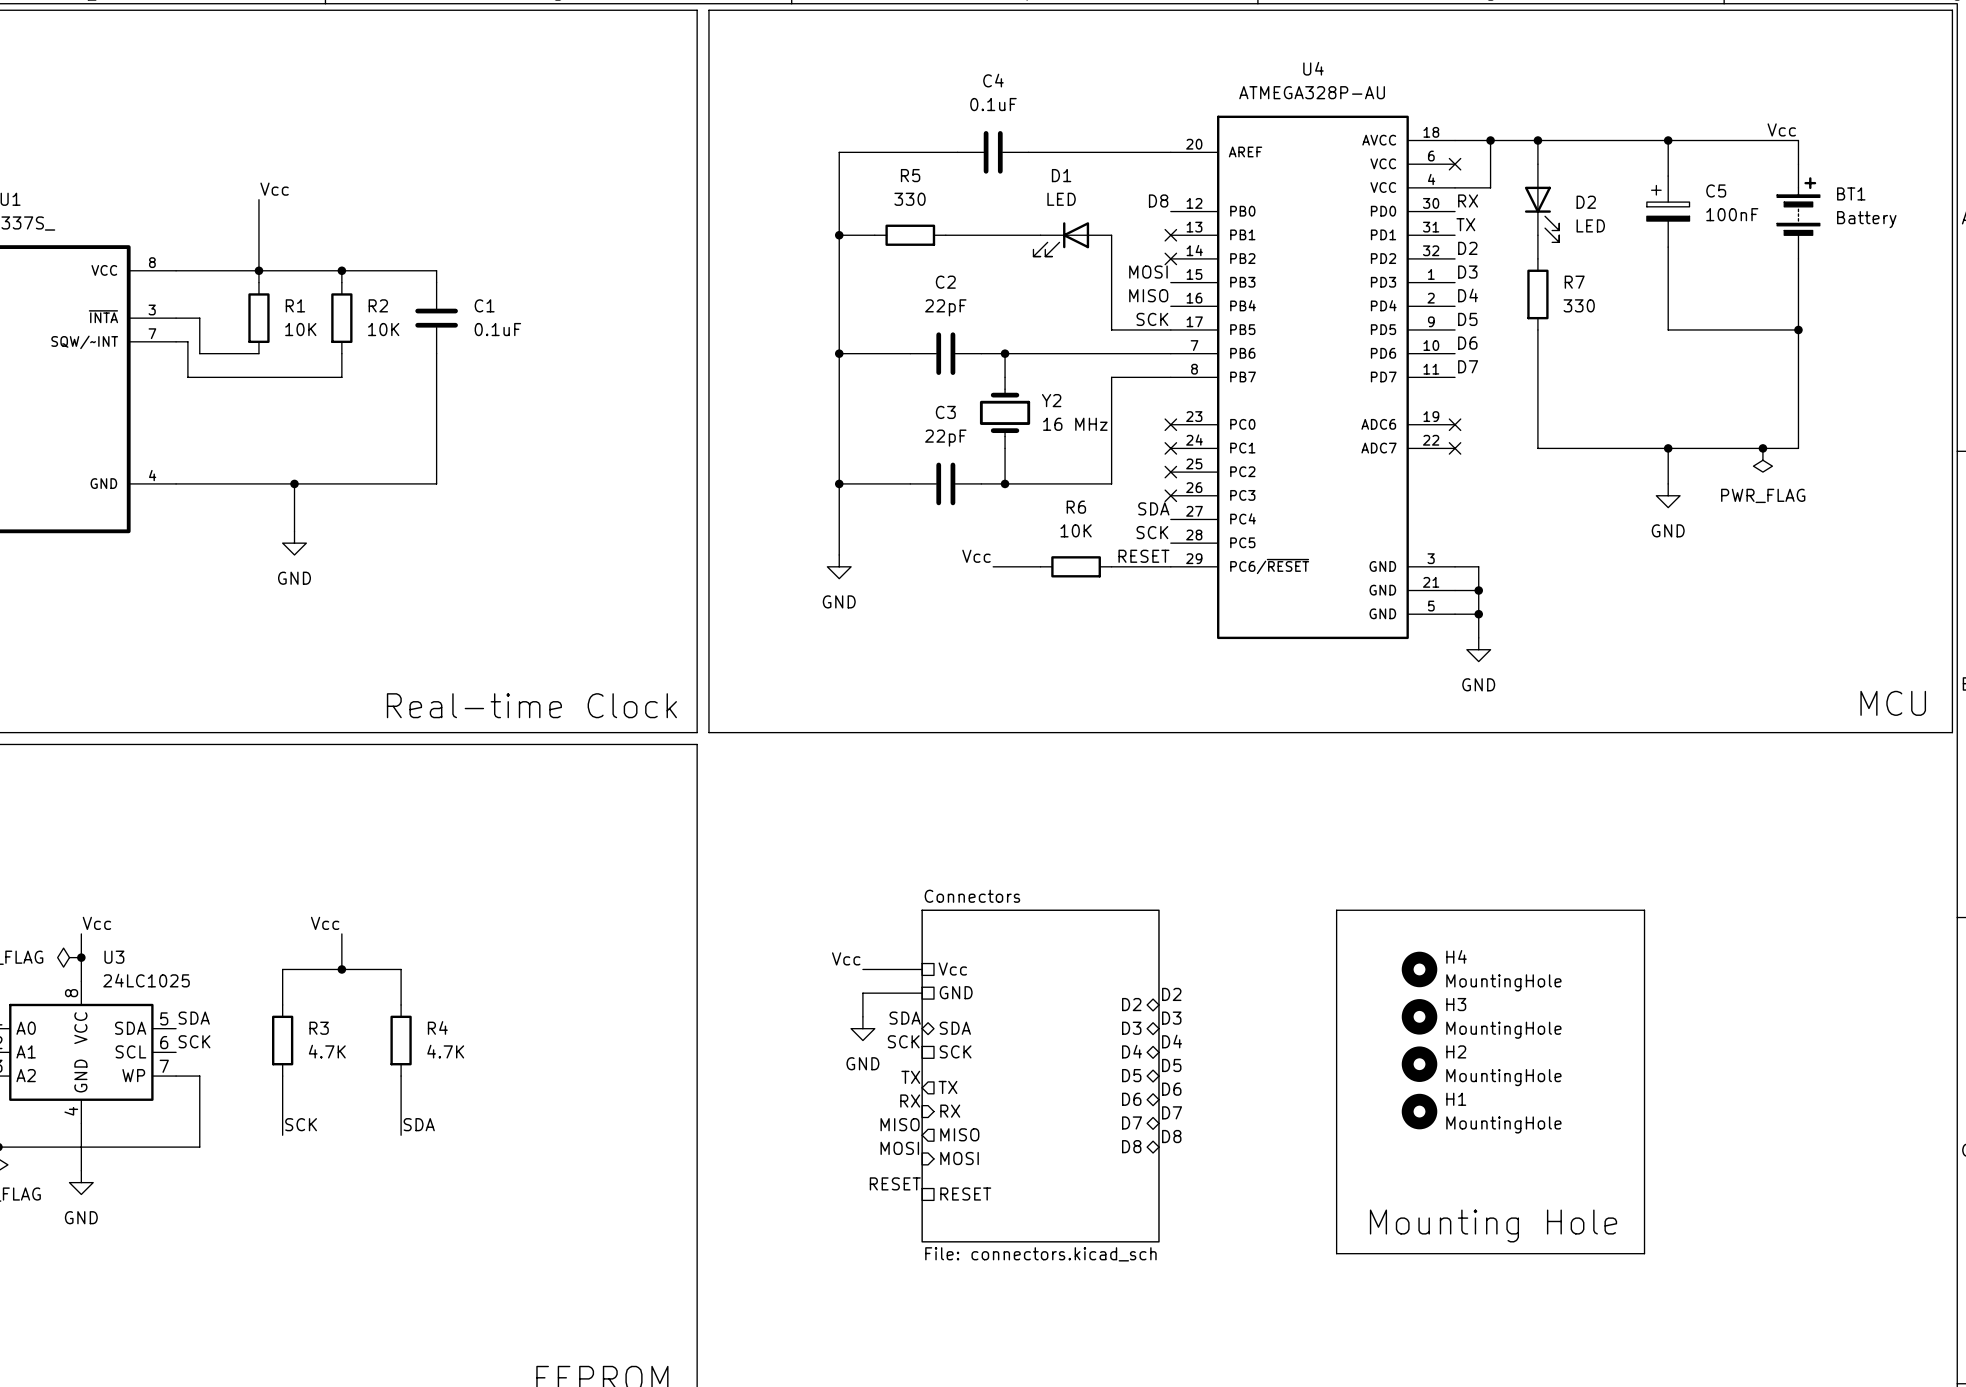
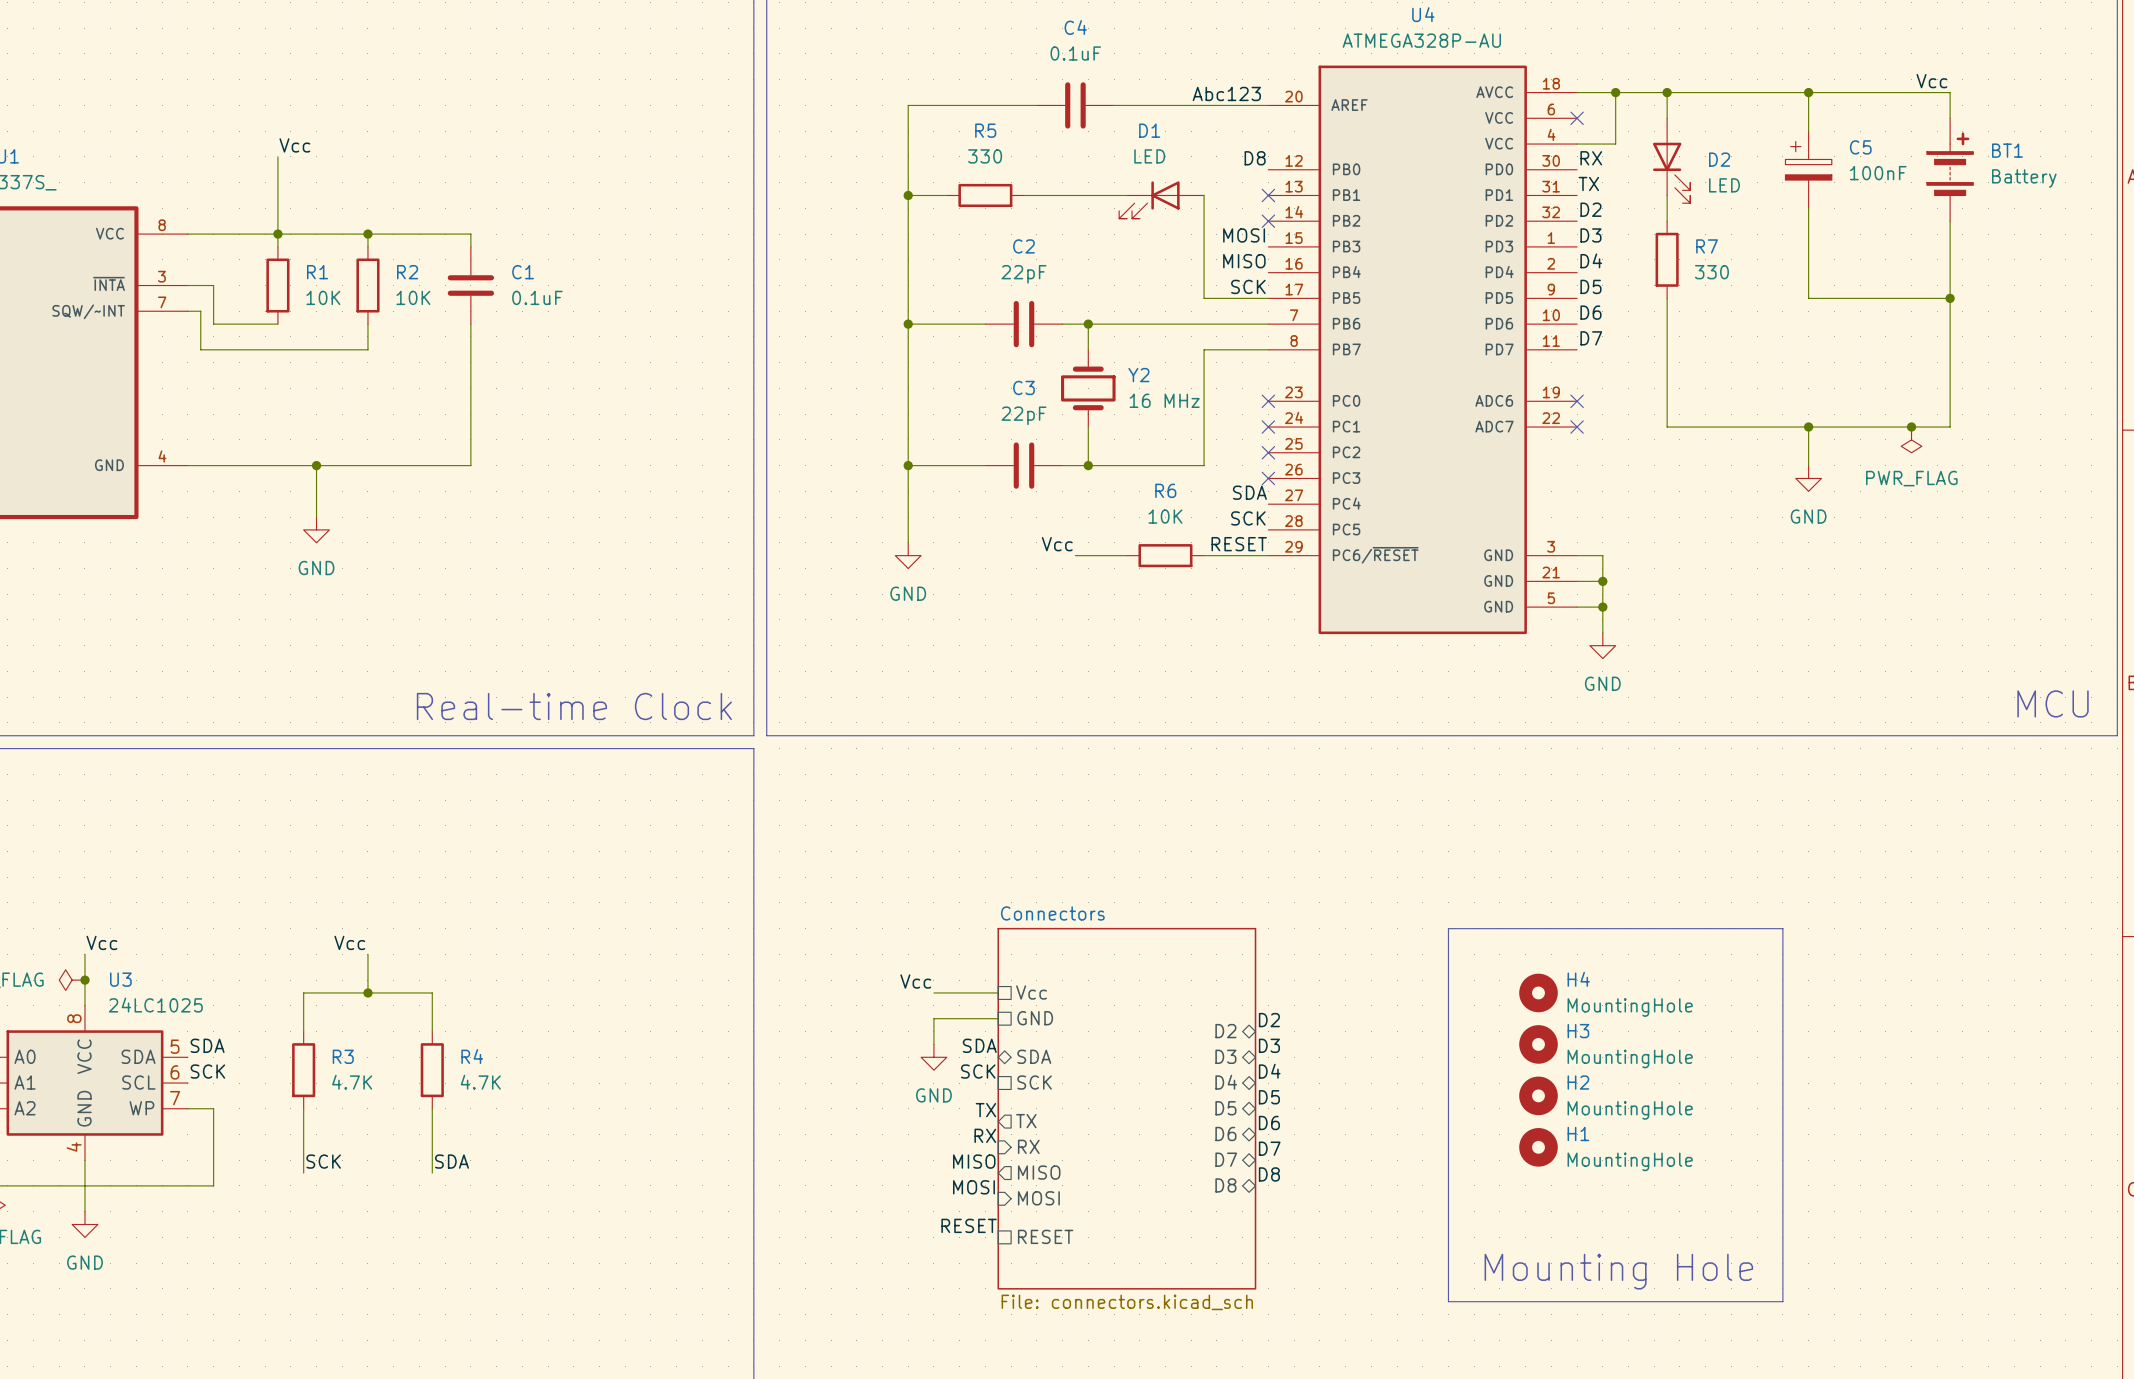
label: none -> Abc123 (1226, 93)

